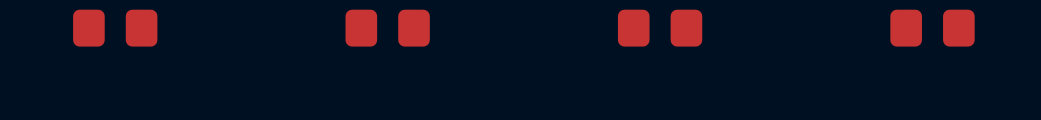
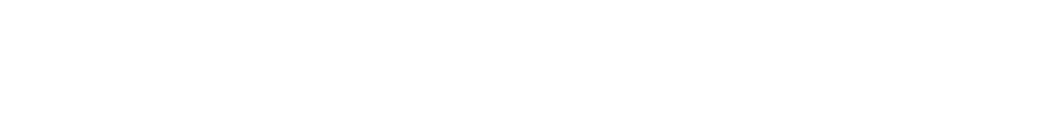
part: (115, 28) -> none
part: (387, 28) -> none
part: (660, 28) -> none
part: (932, 28) -> none

